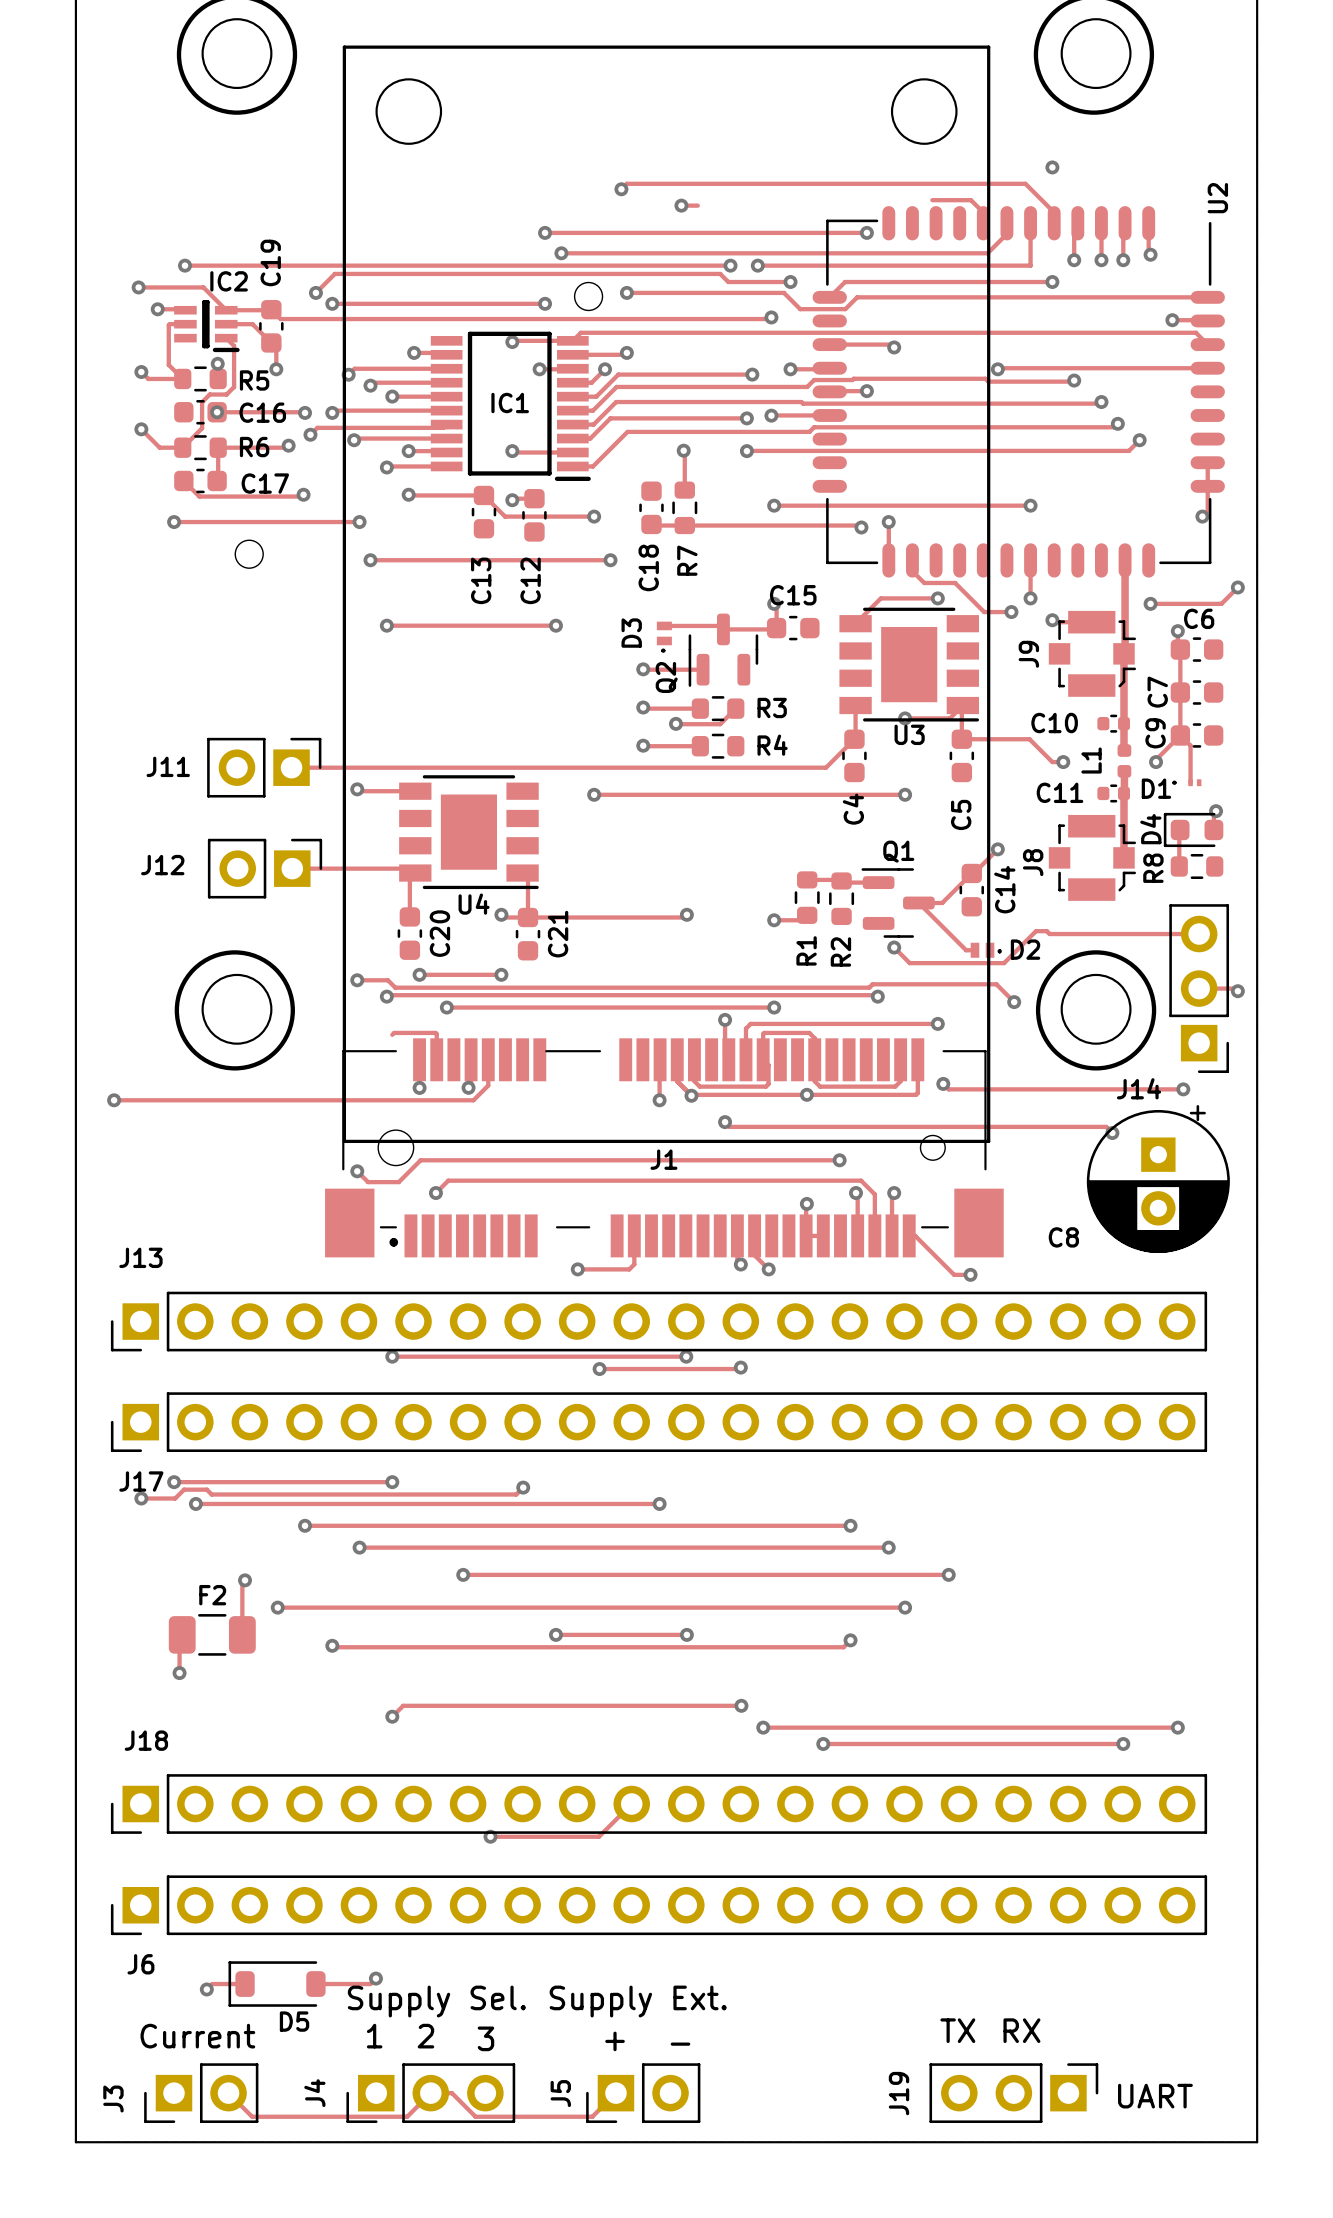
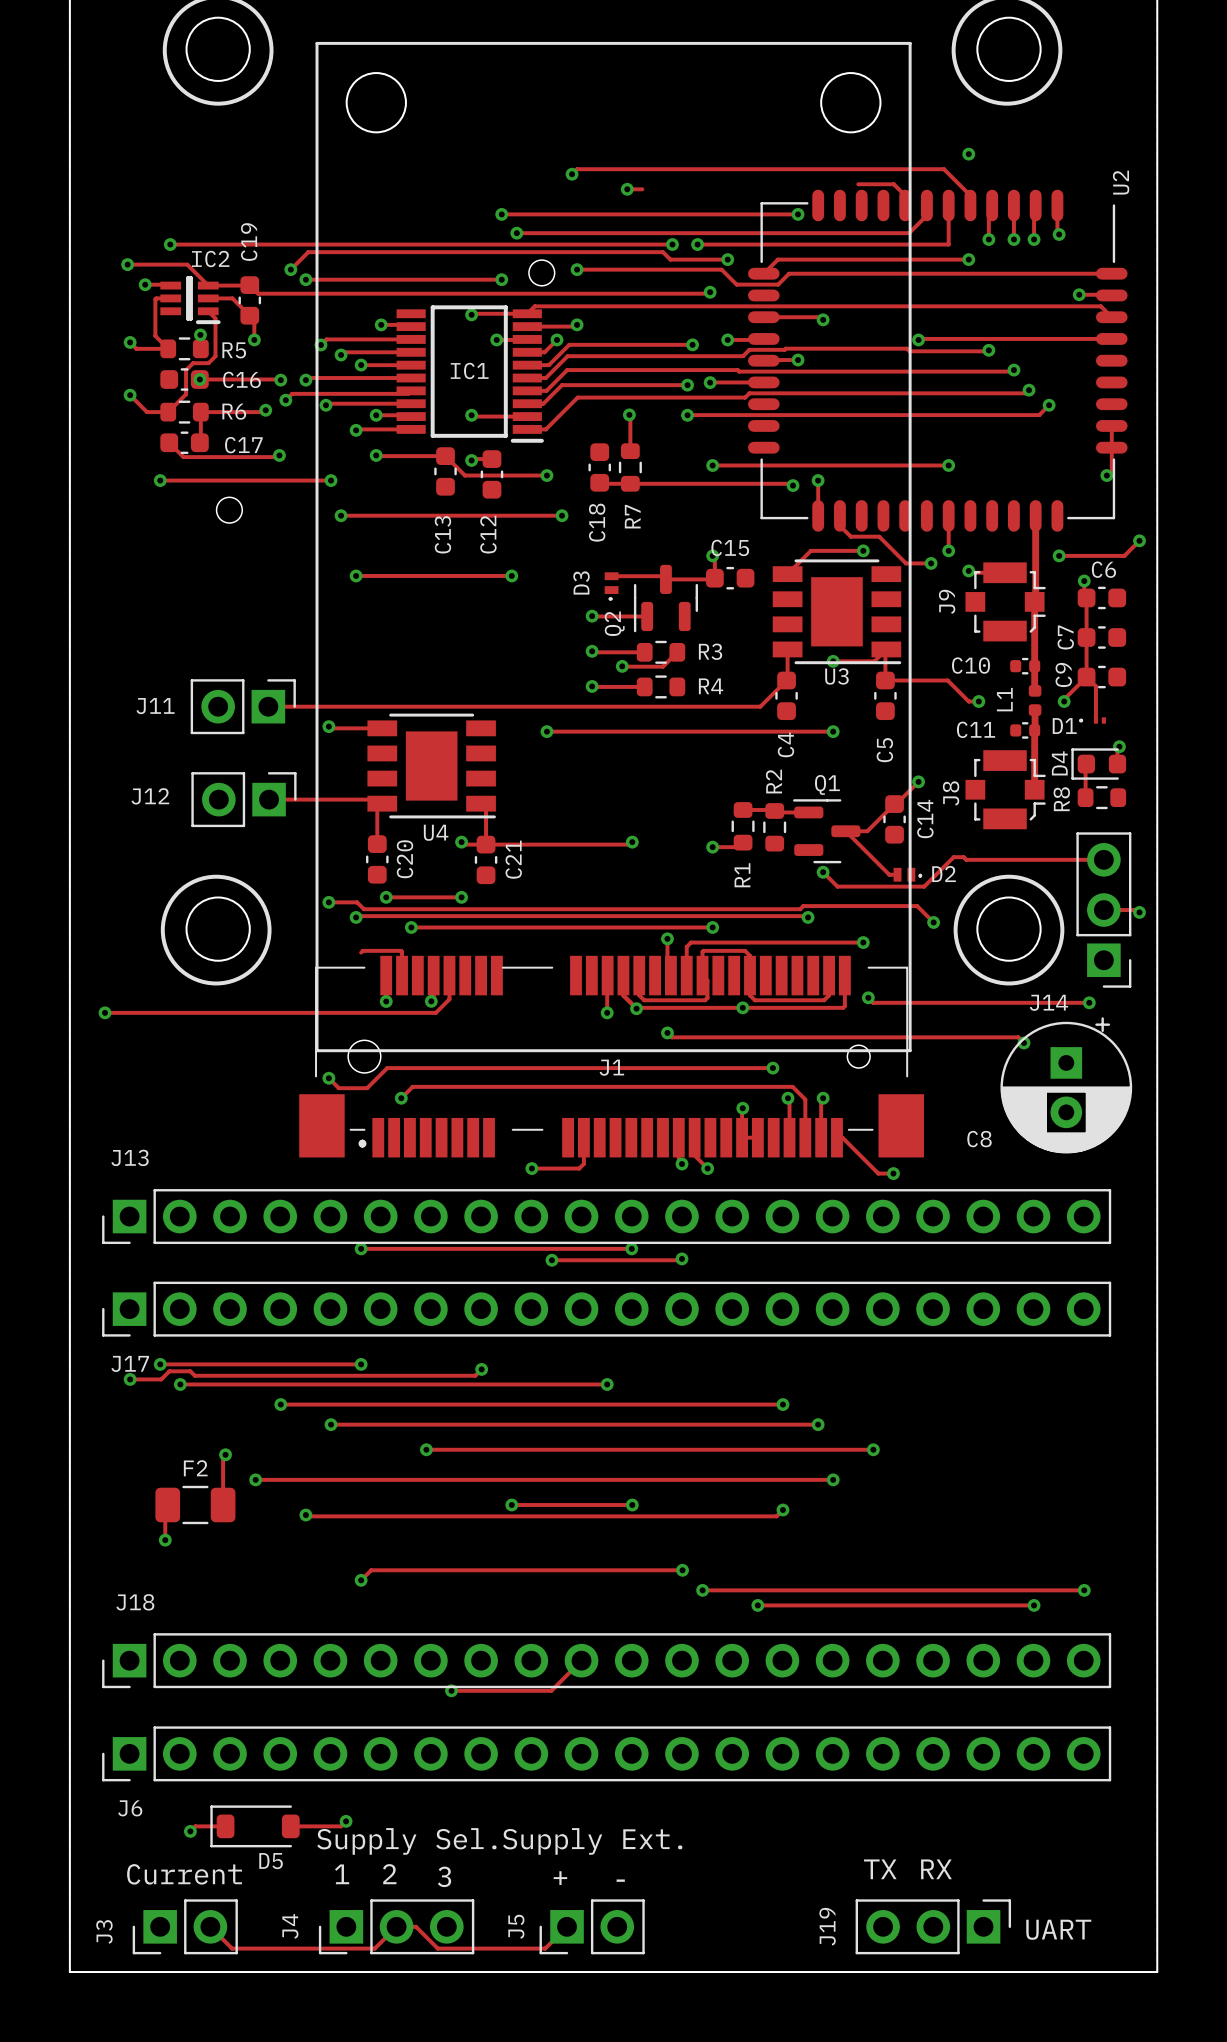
R2 name position: R2 (840, 951) -> R2 (773, 781)

